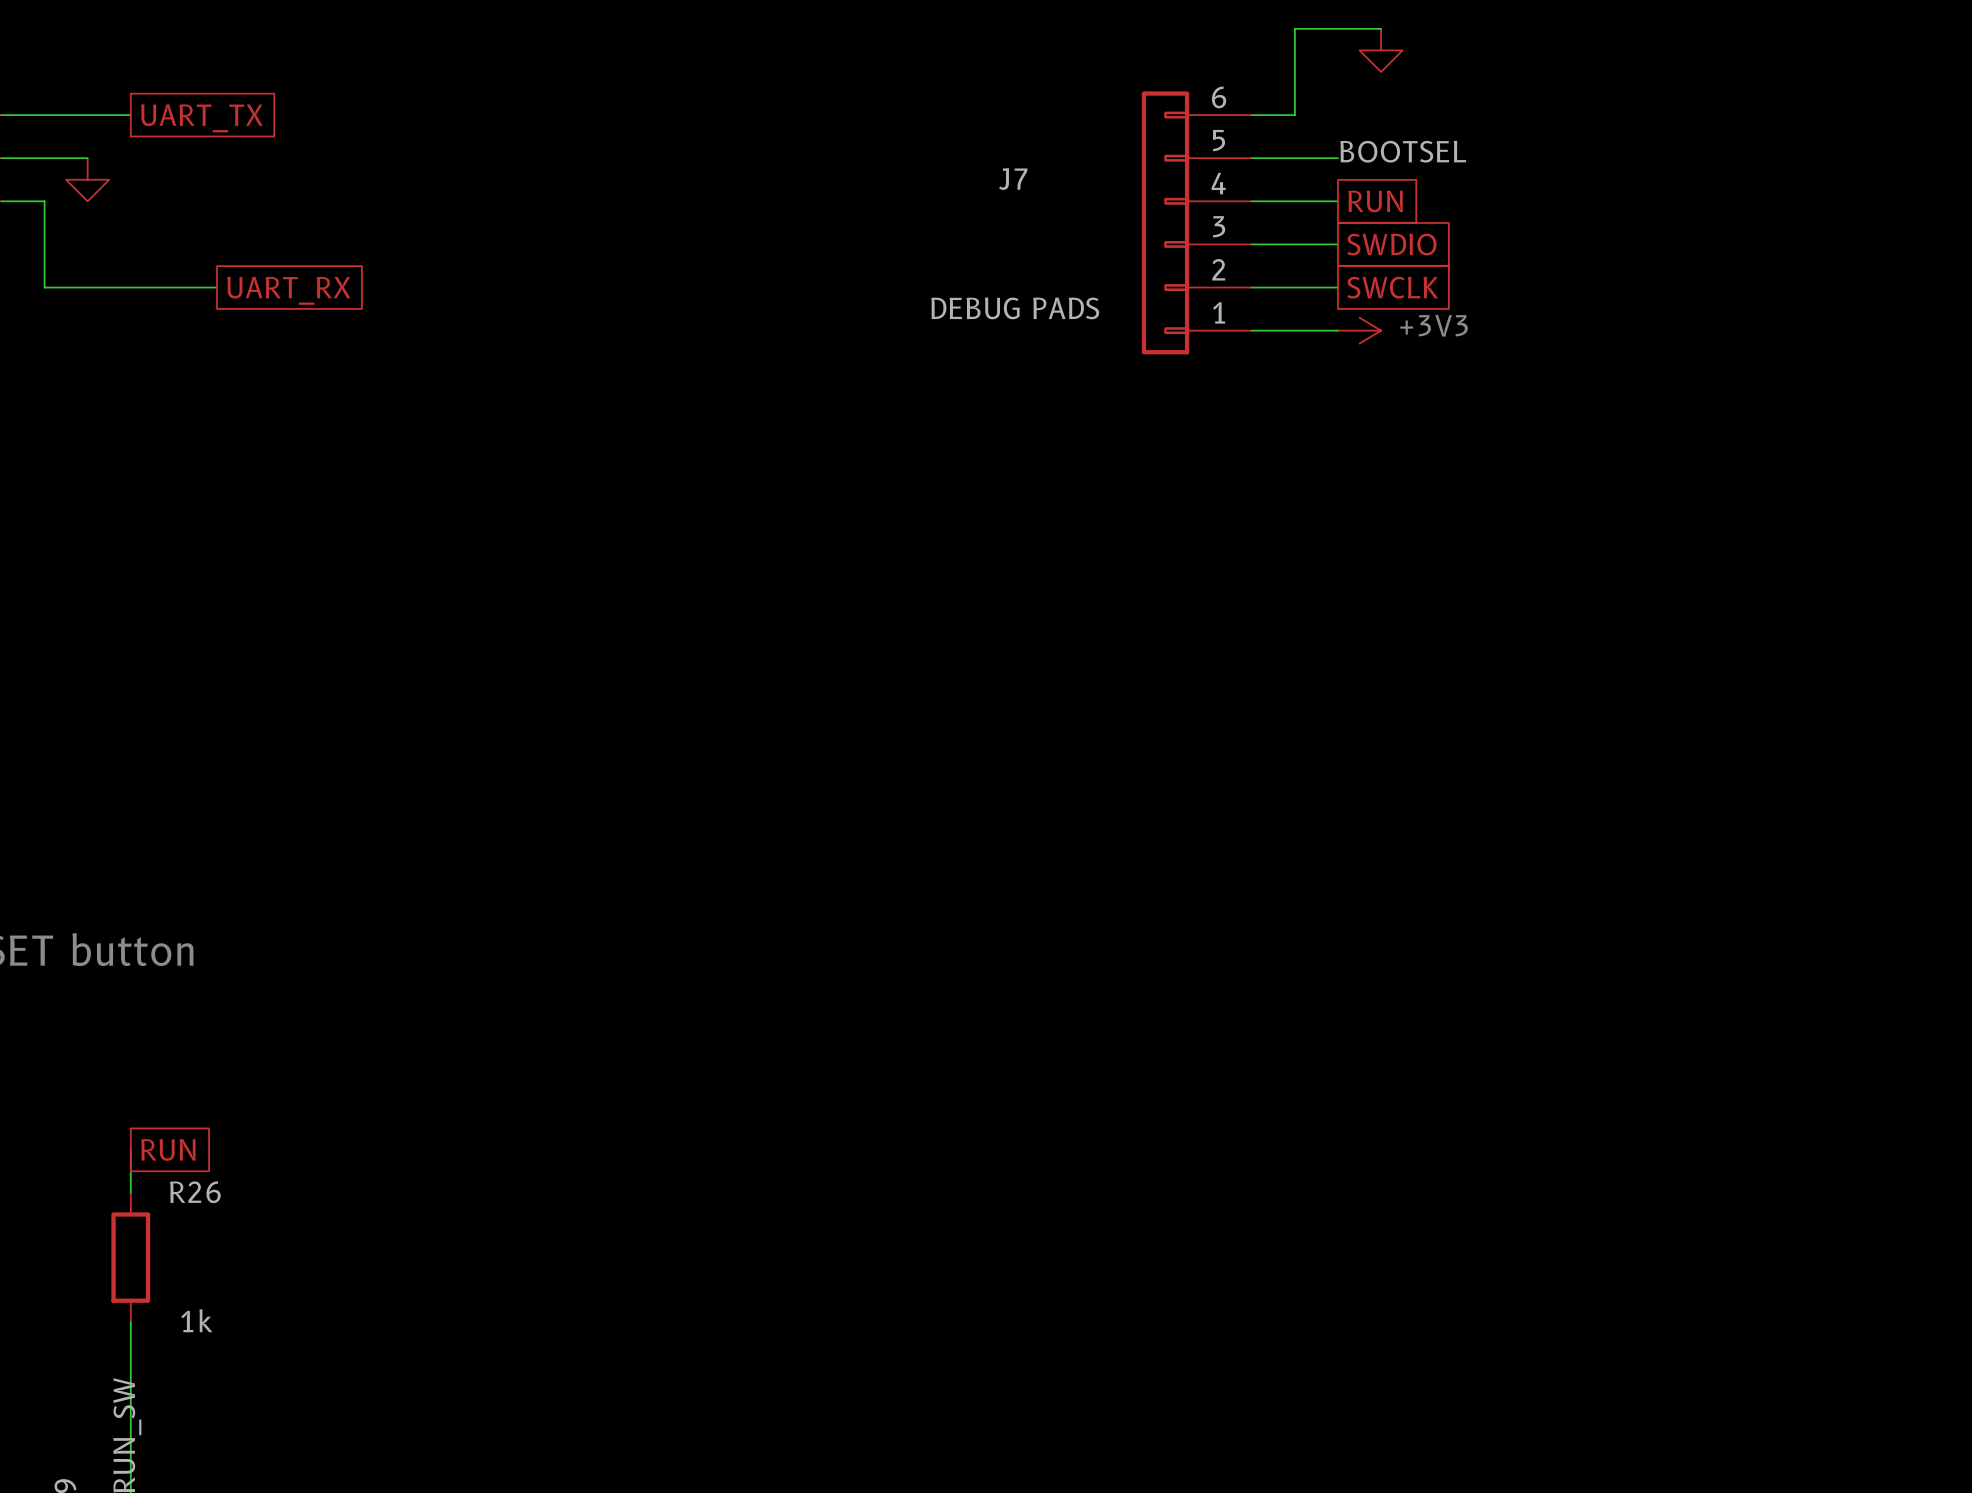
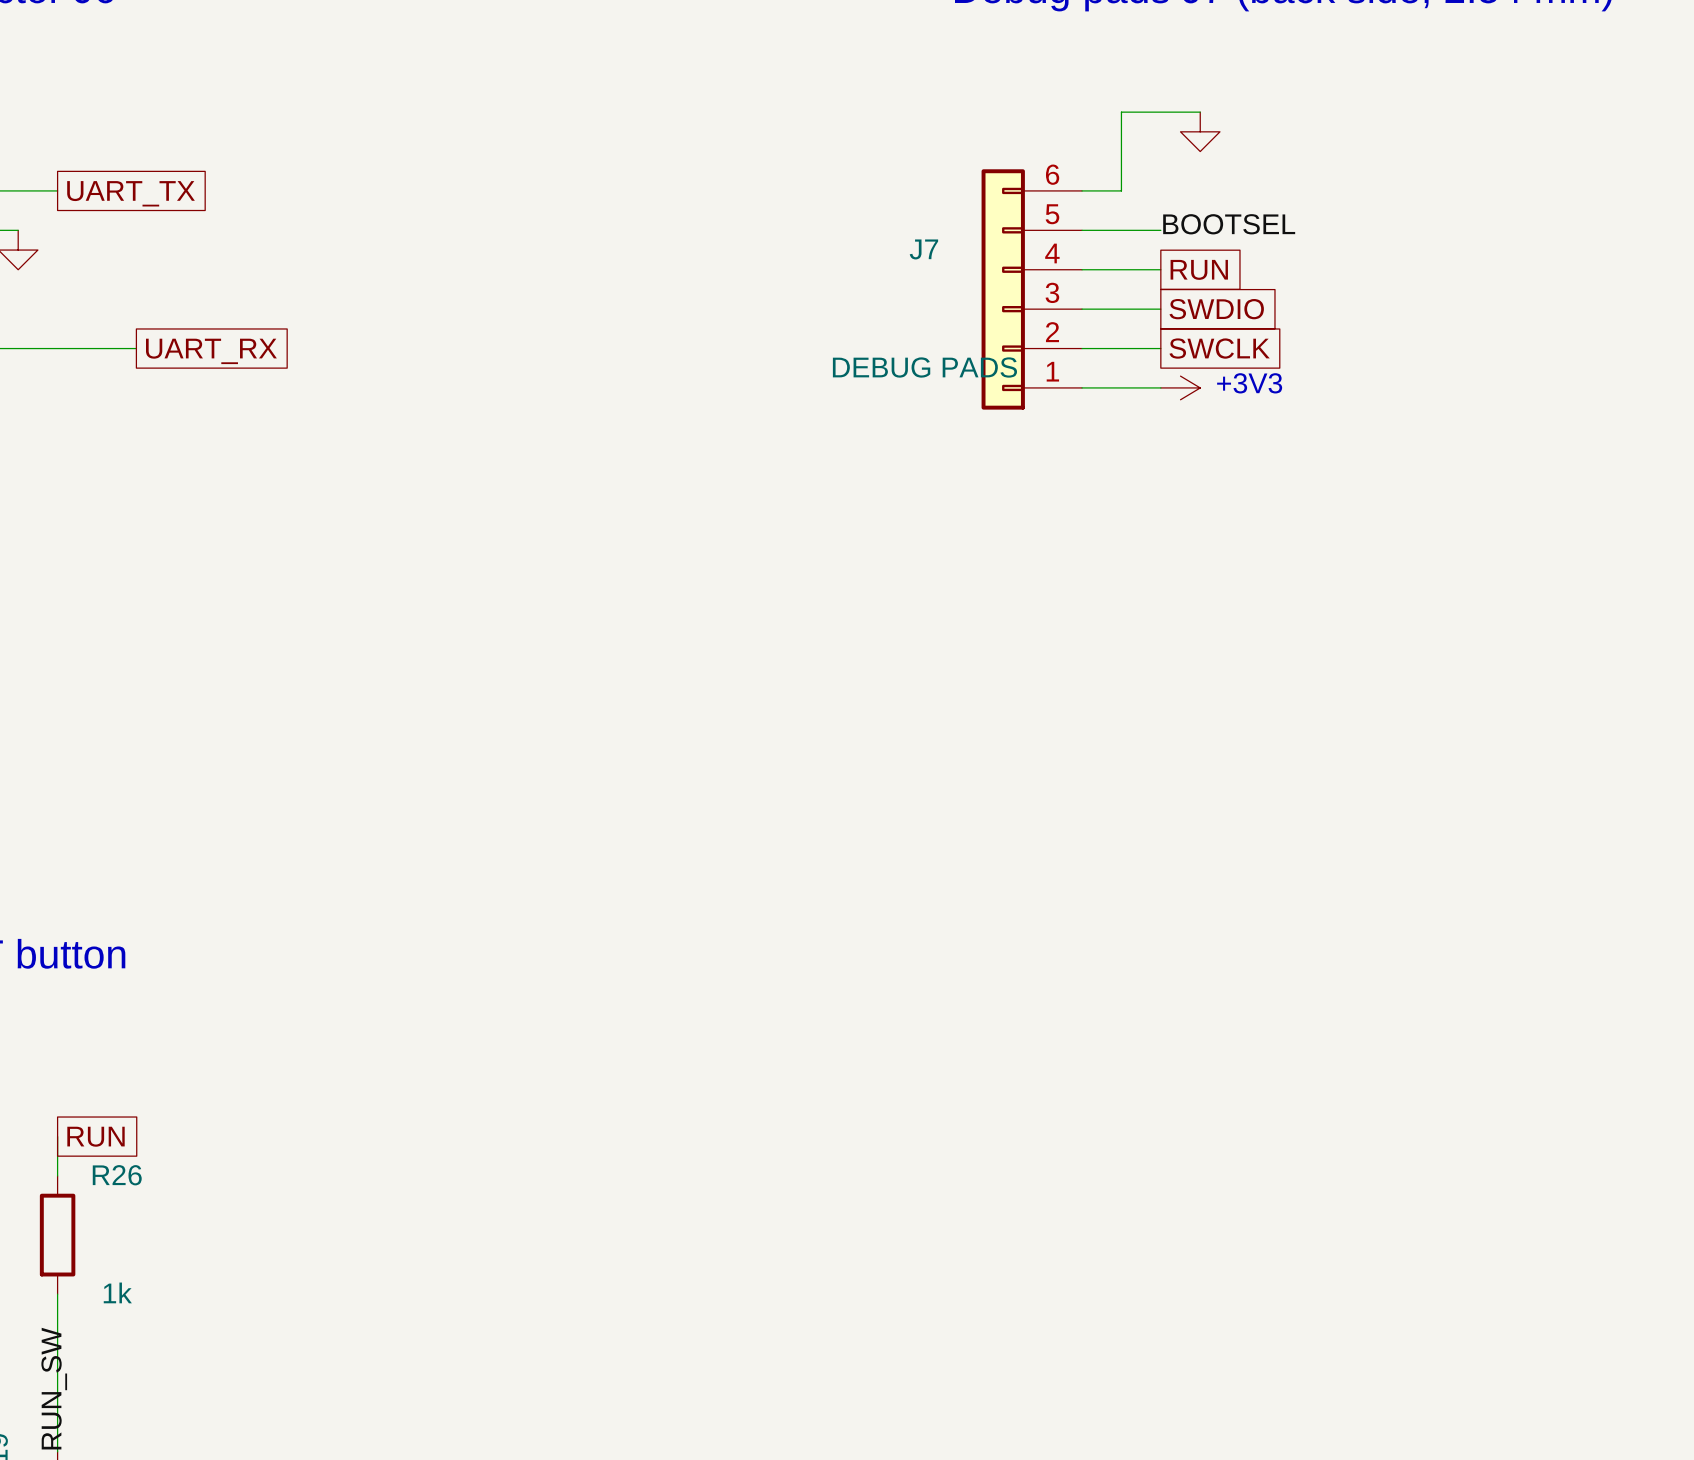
J7 name position: J7 (1013, 179) -> J7 (923, 249)
J7 value position: DEBUG PADS (1015, 308) -> DEBUG PADS (924, 367)

